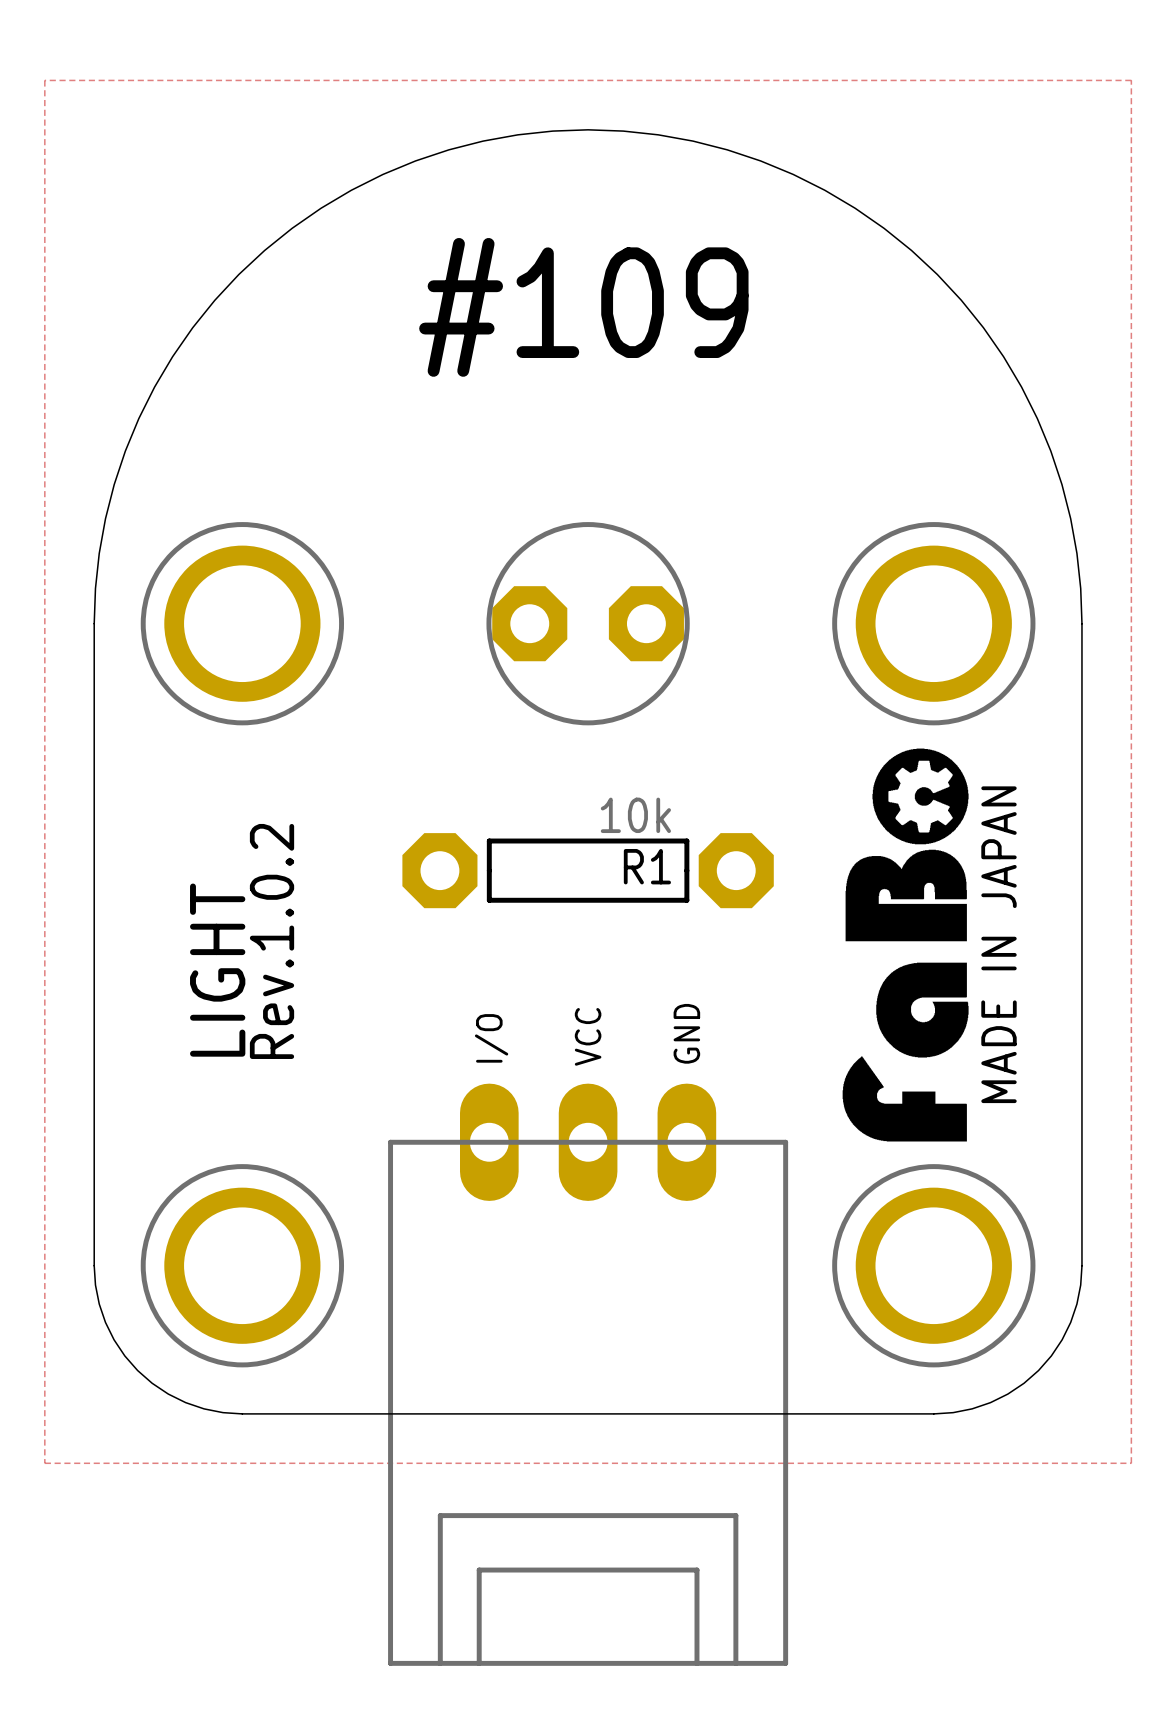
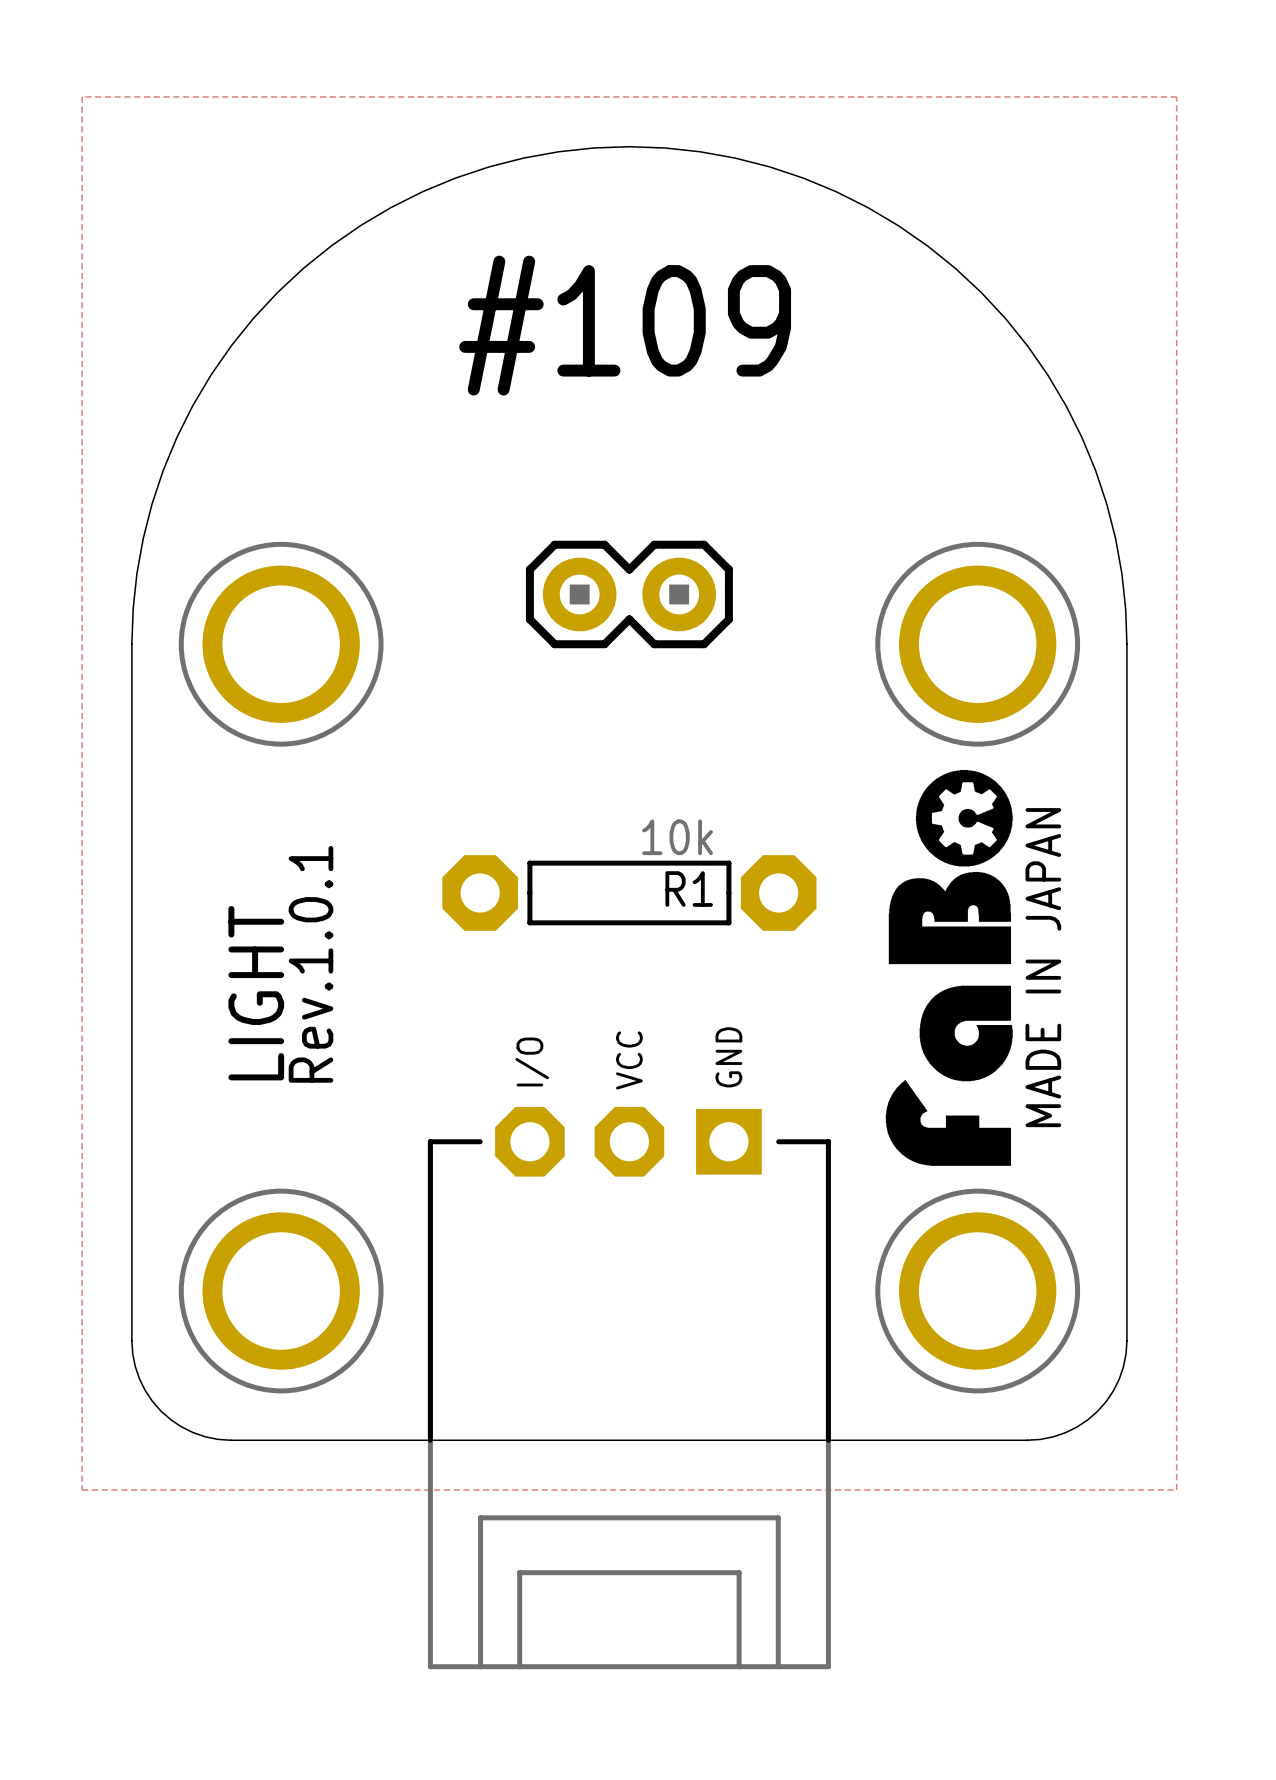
part footprint: [94, 129, 1082, 1666] -> [131, 146, 1127, 1670]
part: none -> (629, 594)
part: (588, 623) -> none
text: Rev.1.0.2 (272, 941) -> Rev.1.0.1 (311, 964)

